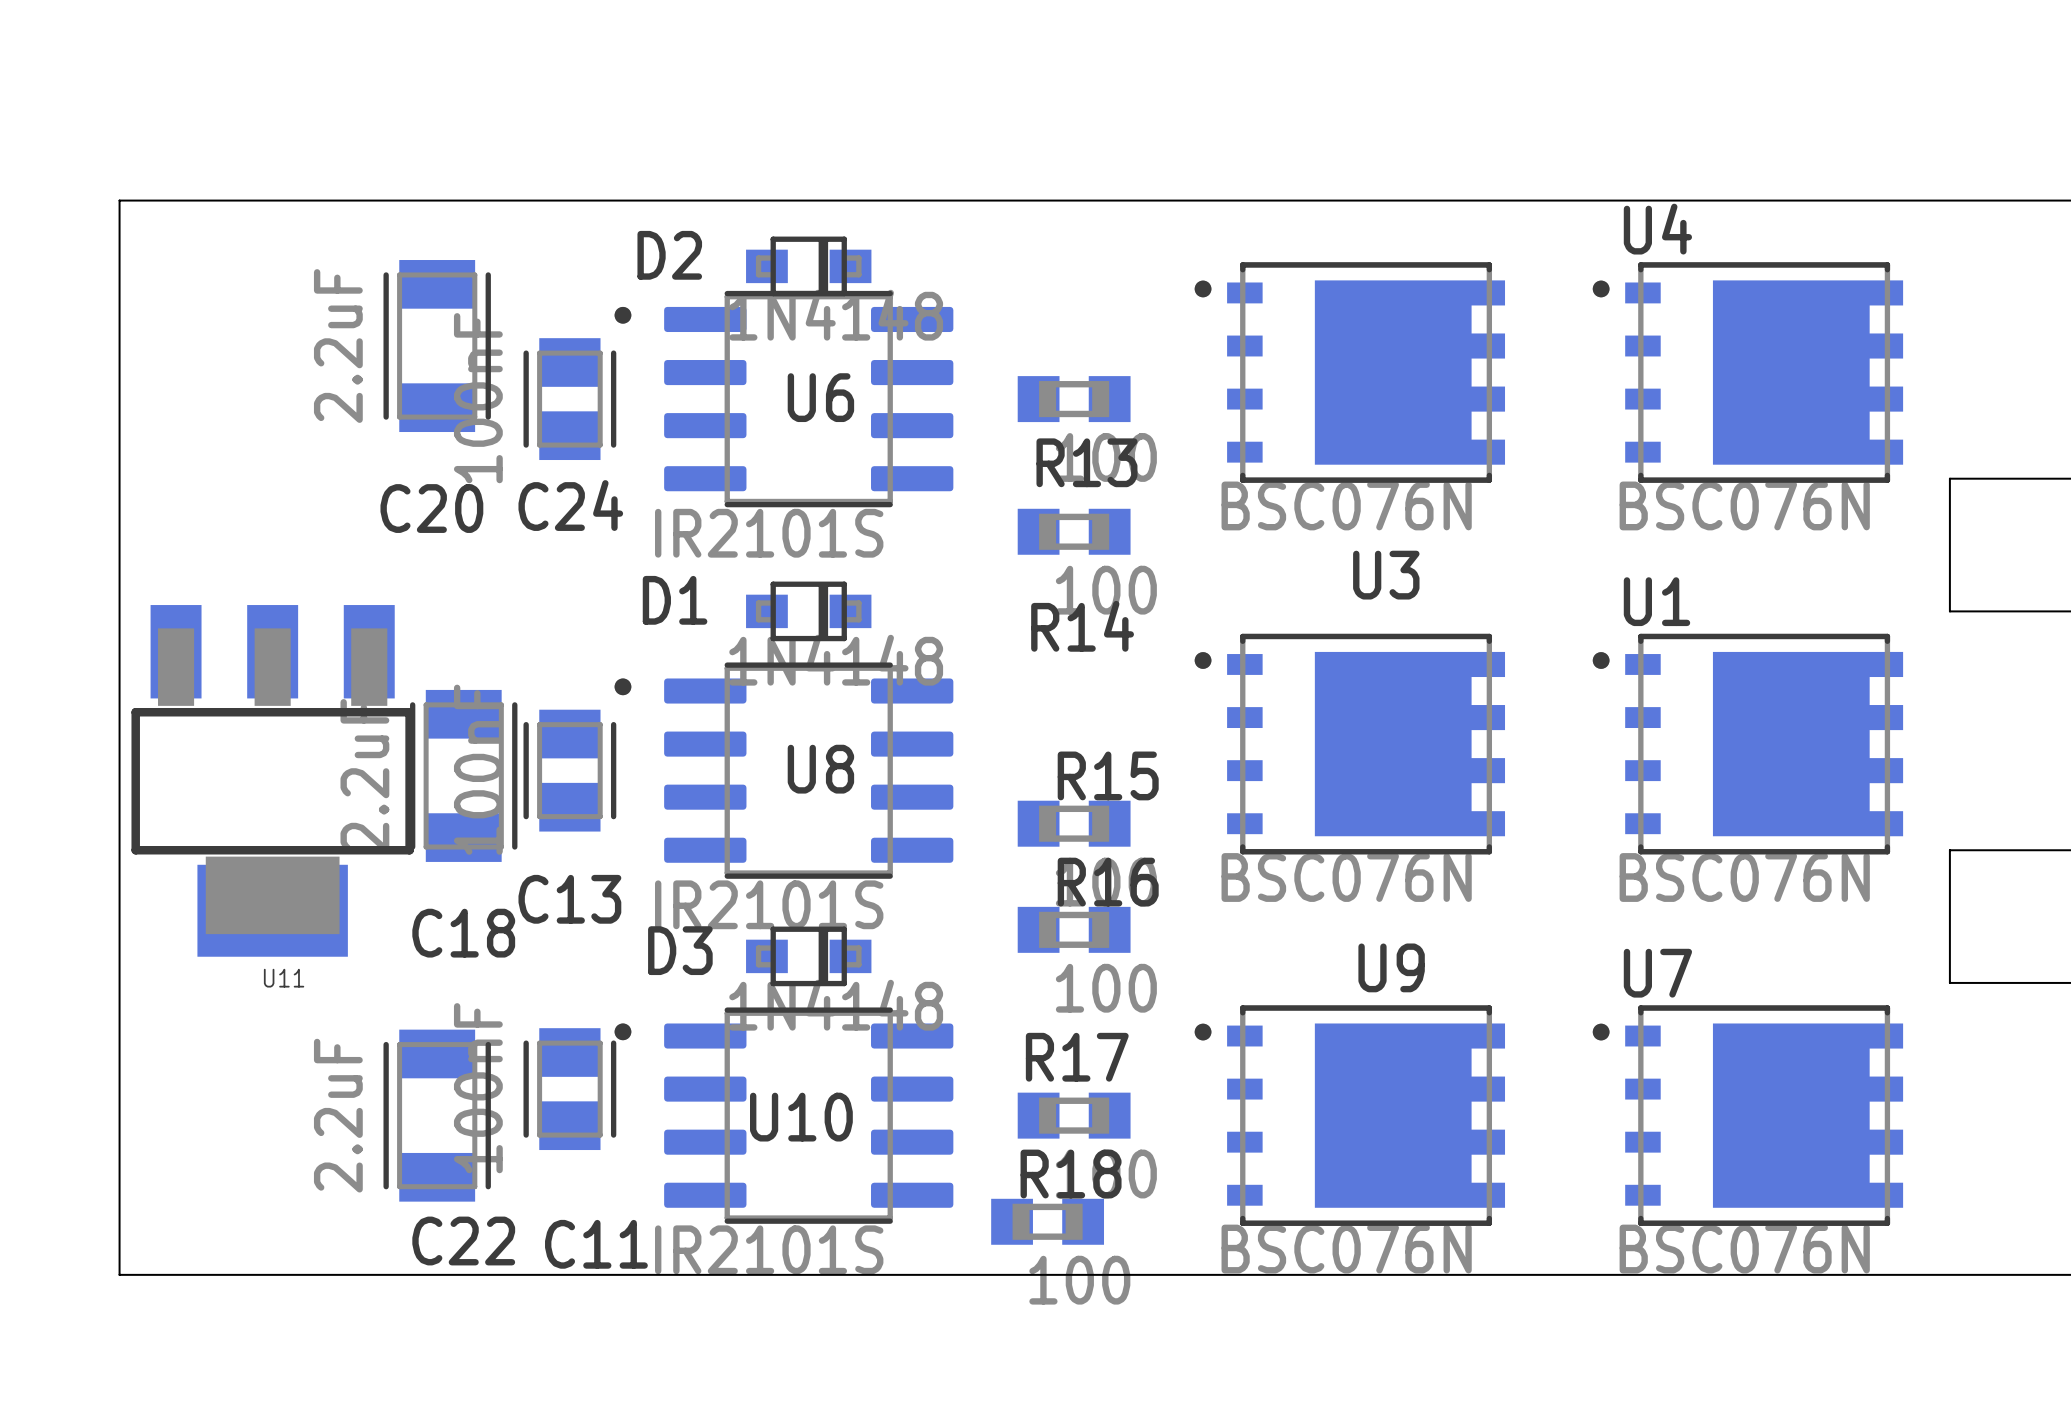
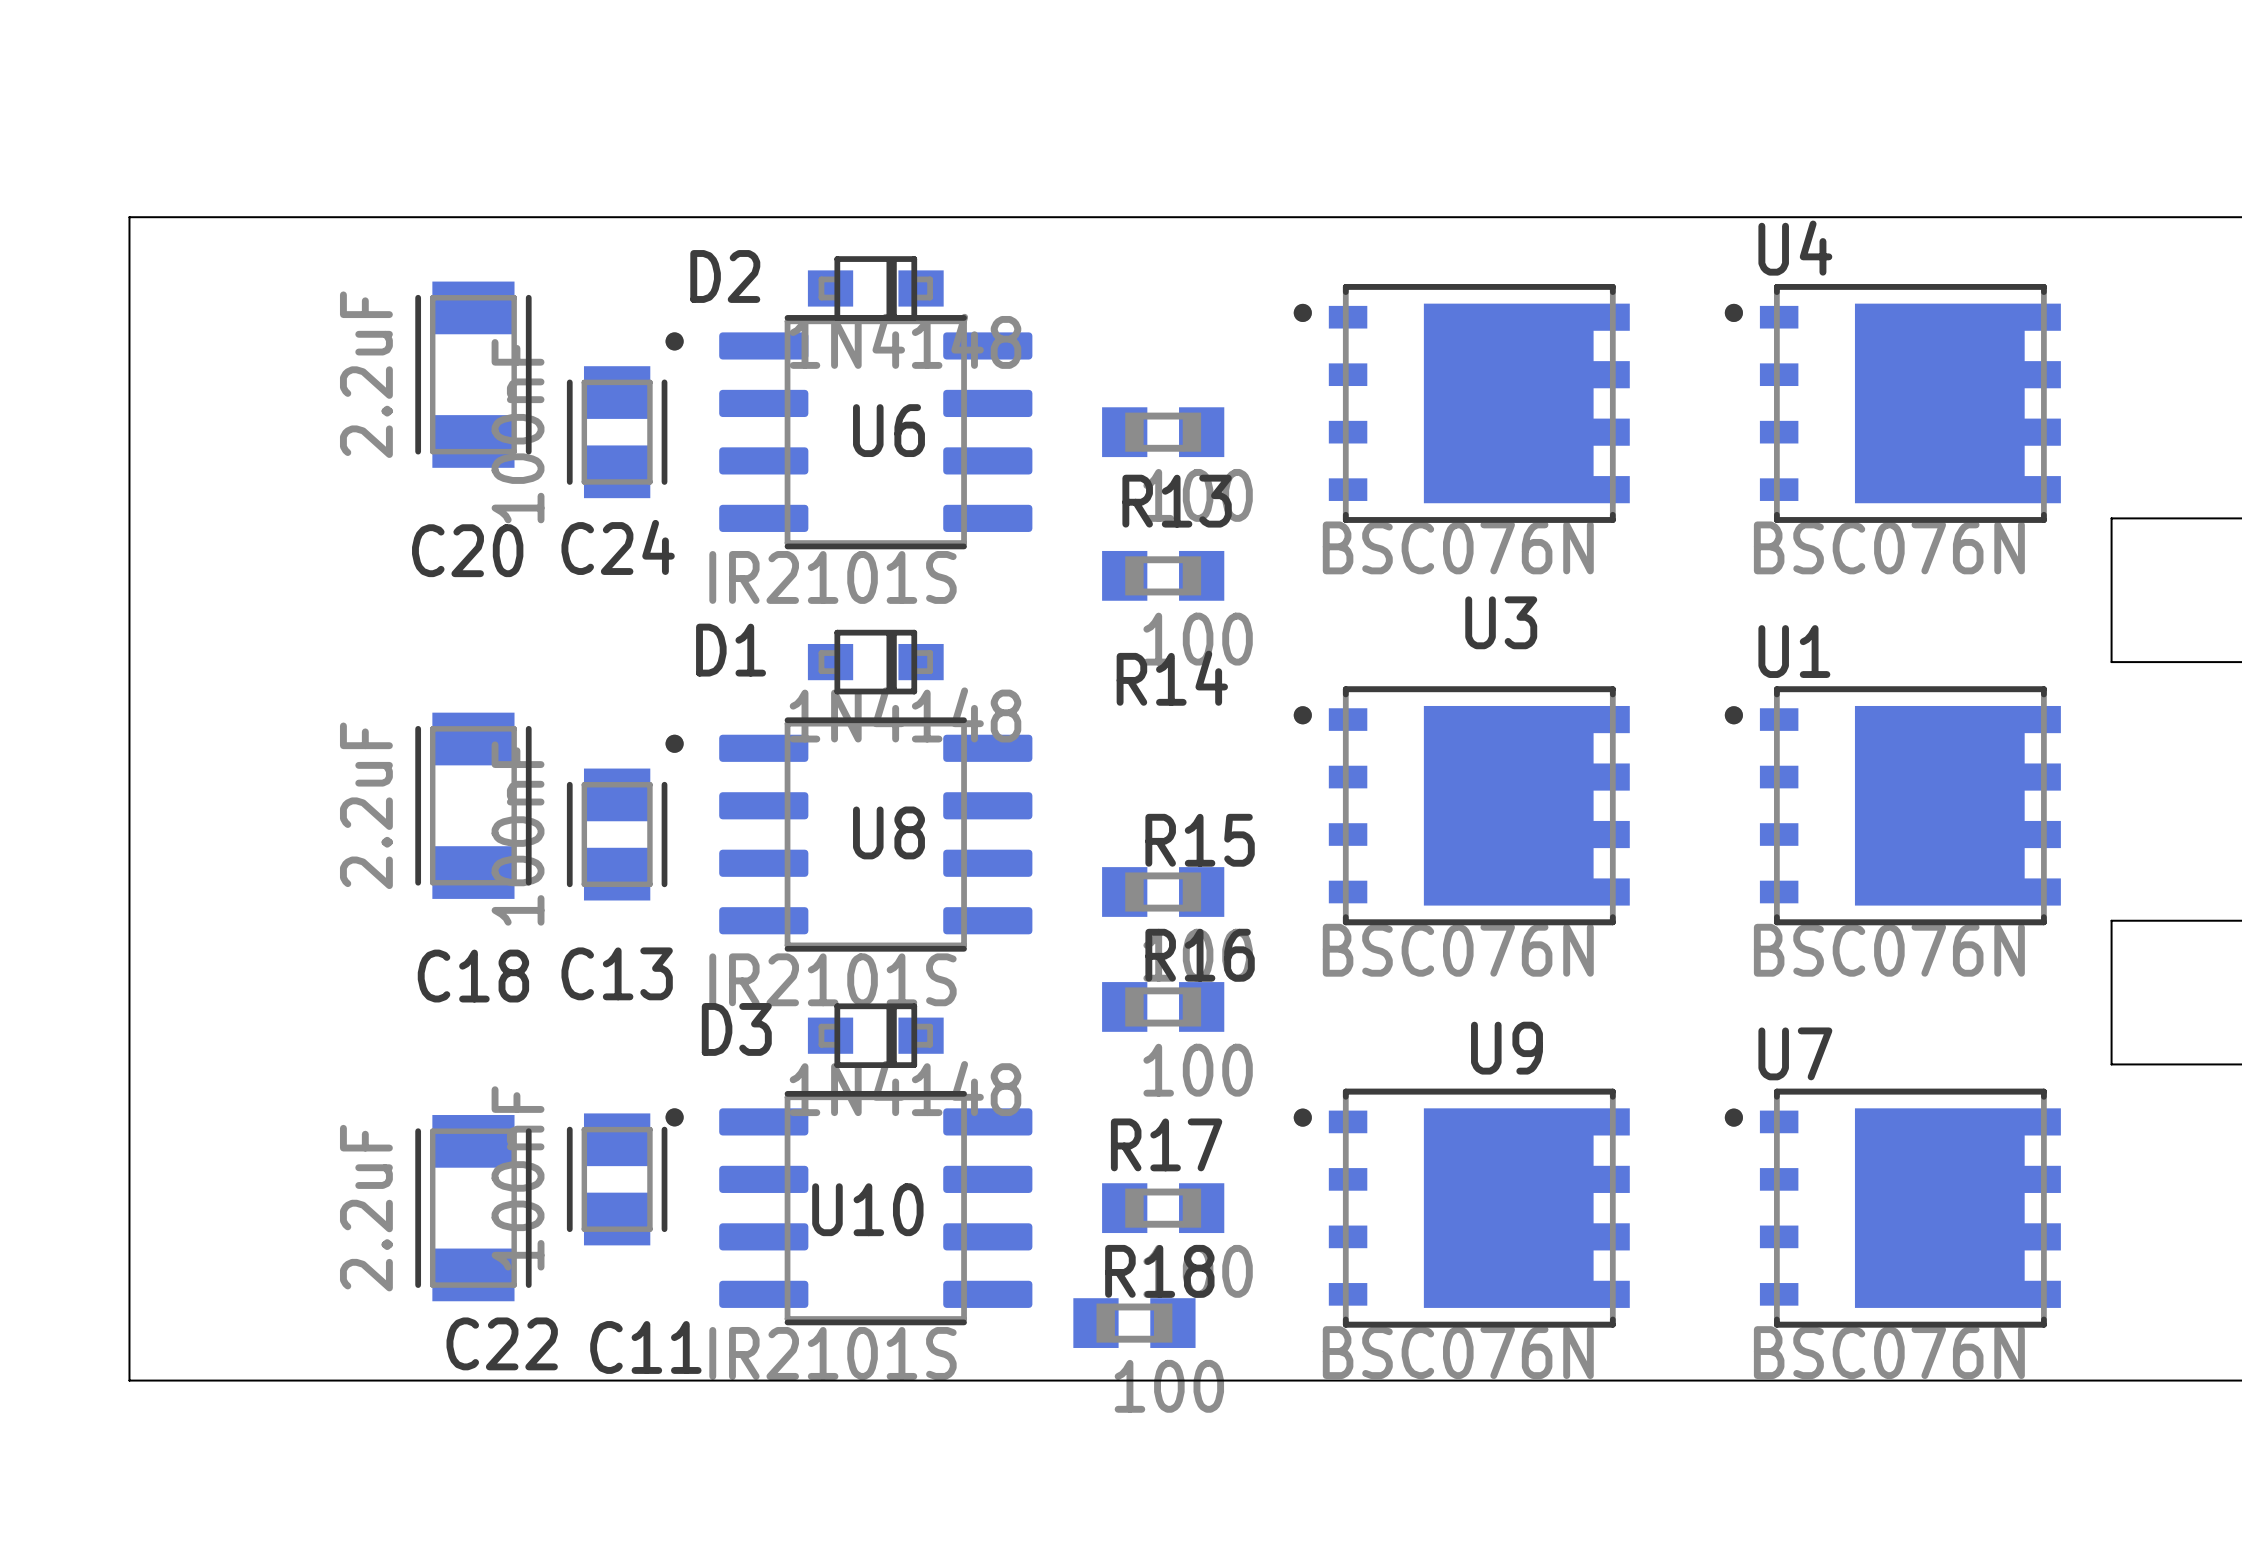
C18 position: (463, 775) -> (473, 805)
U11: (272, 780) -> none

